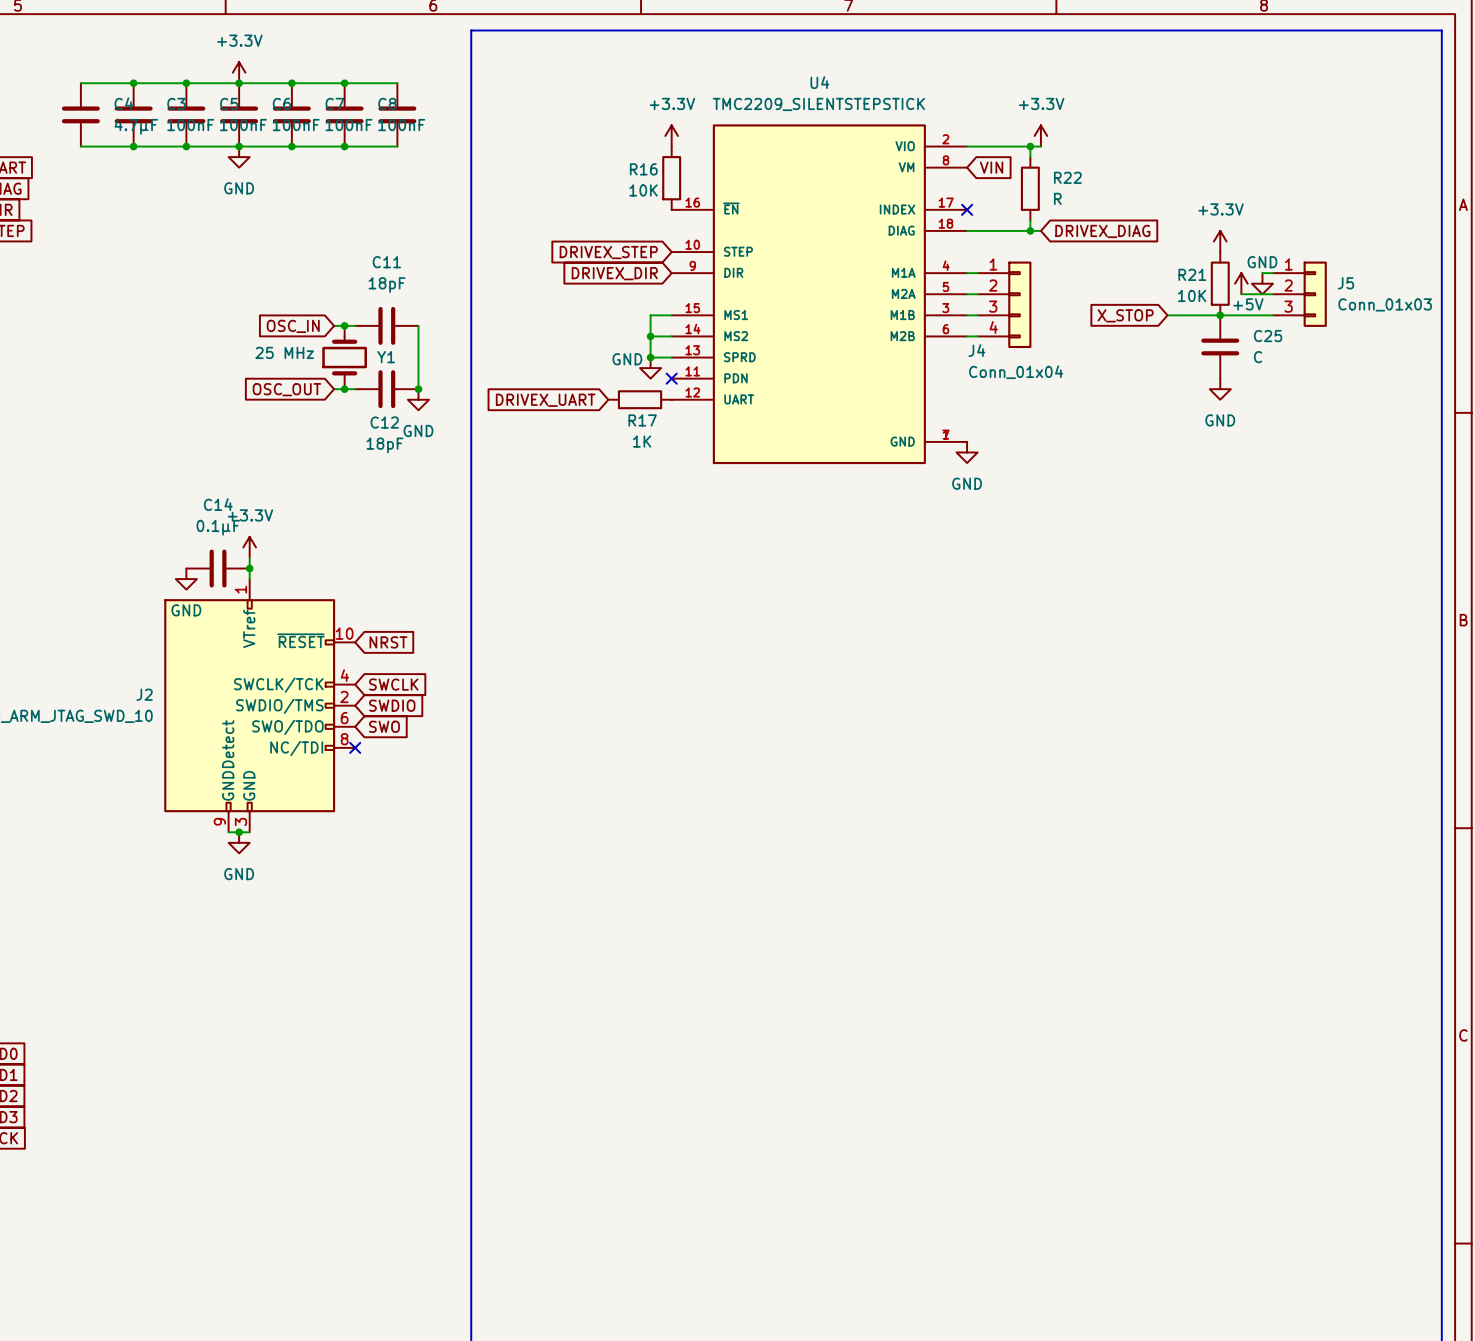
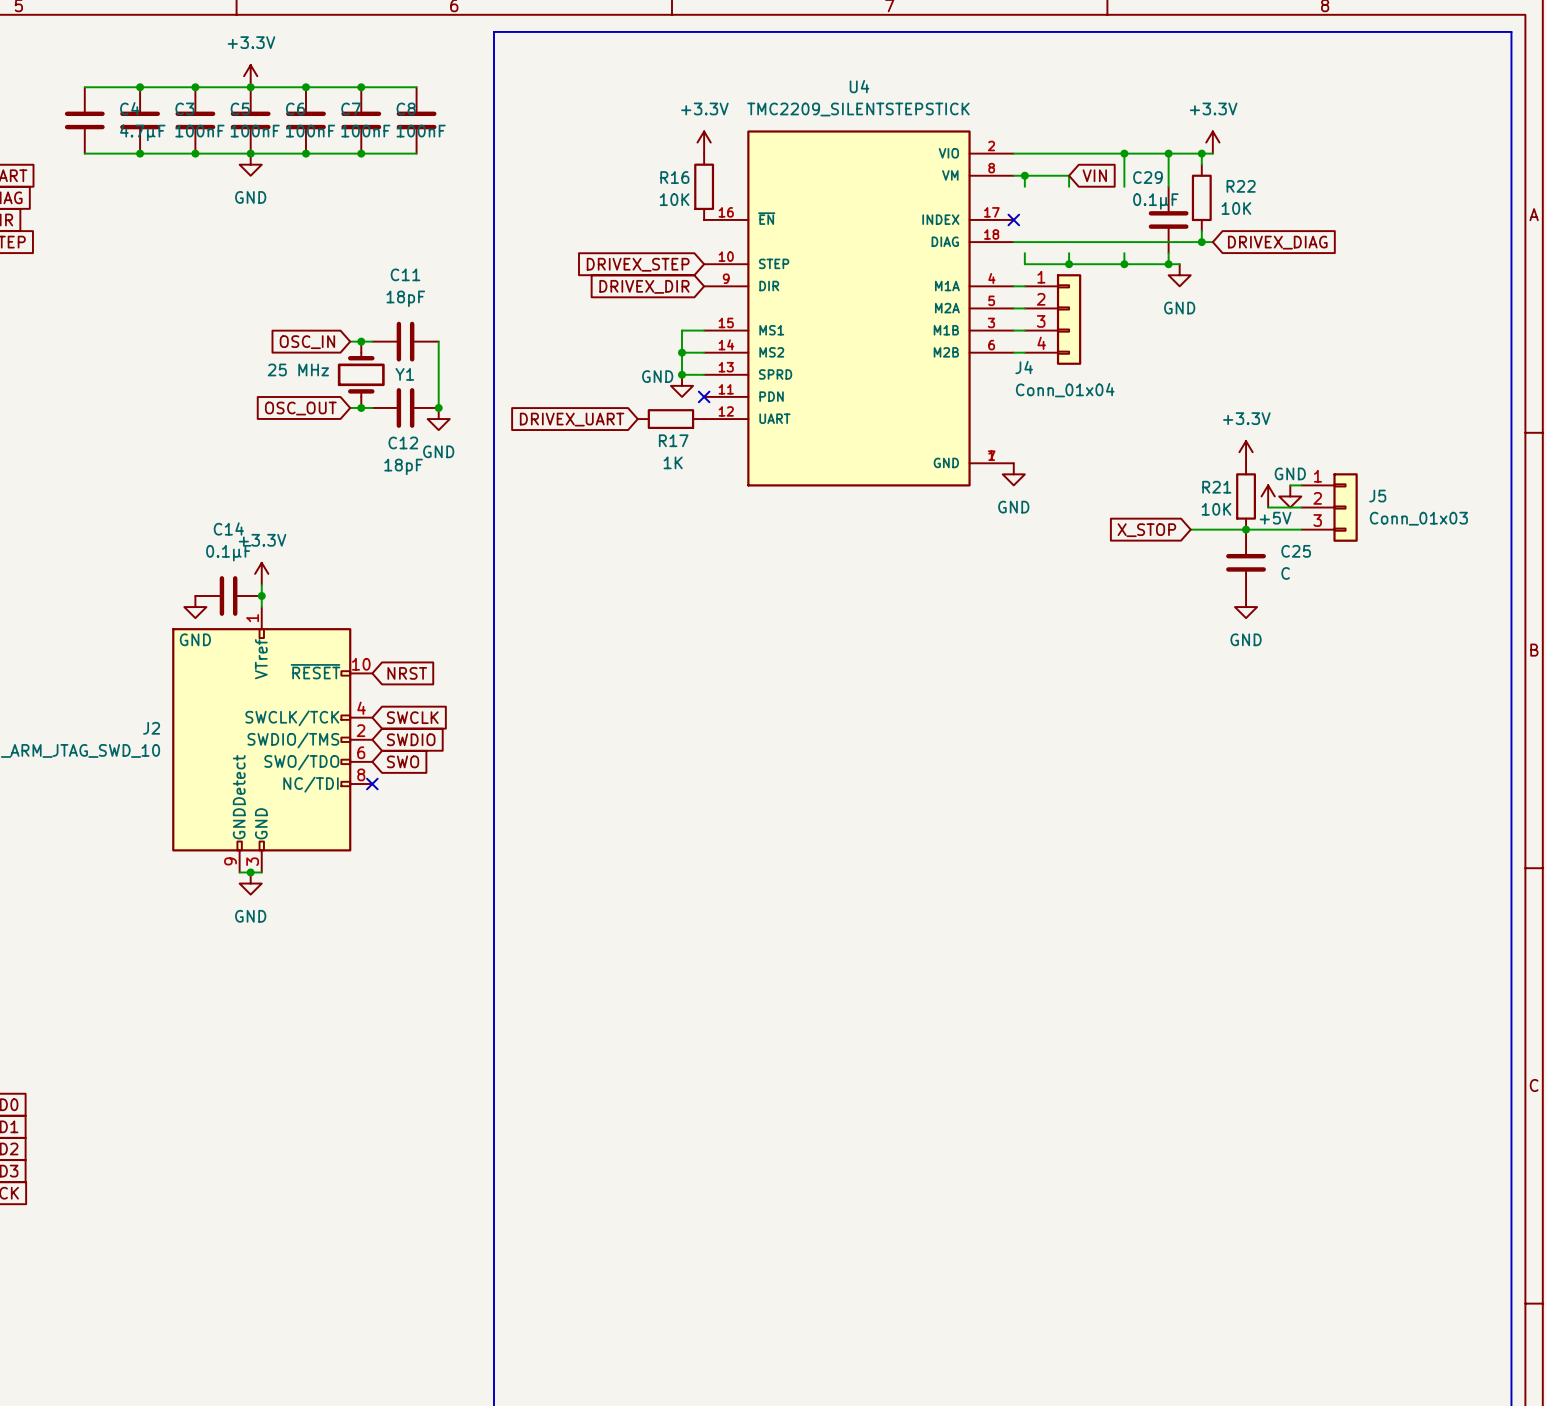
power symbol: +3.3V (1040, 135) -> none
power symbol: none -> +3.3V (1212, 142)
wire: (1030, 146) (1030, 157) -> (1201, 153) (1201, 164)
junction: (1030, 146) -> none
wire: none -> (1091, 153) (1212, 153)
wire: none -> (1124, 153) (1124, 186)
junction: none -> (1124, 153)
wire: none -> (1168, 153) (1168, 186)
junction: none -> (1168, 153)
junction: none -> (1201, 153)
wire: none -> (1013, 175) (1069, 175) (1069, 186)
wire: none -> (1024, 175) (1024, 186)
junction: none -> (1024, 175)
global label position: VIN (991, 167) -> VIN (1094, 175)
R22 position: (1030, 188) -> (1201, 197)
R22 value: R (1057, 198) -> 10K (1236, 208)
C29: none -> 0.1µF (1168, 219)
wire: (1030, 220) (1030, 230) -> (1201, 231) (1201, 242)
junction: (1030, 230) -> none
wire: none -> (1091, 242) (1212, 242)
junction: none -> (1201, 242)
global label position: DRIVEX_DIAG (1102, 231) -> DRIVEX_DIAG (1277, 242)
wire: none -> (1024, 253) (1024, 264) (1179, 264)
wire: none -> (1069, 253) (1069, 264)
wire: none -> (1124, 253) (1124, 264)
wire: none -> (1168, 253) (1168, 264)
power symbol: +3.3V (1220, 241) -> none
junction: none -> (1069, 264)
junction: none -> (1124, 264)
junction: none -> (1168, 264)
power symbol: none -> GND (1179, 275)
wire: (1262, 273) (1273, 273) -> (1290, 485) (1301, 485)
R21 position: (1220, 283) -> (1246, 496)
power symbol position: +5V (1241, 283) -> +5V (1268, 496)
power symbol: GND (1262, 283) -> none
wire: (1241, 294) (1273, 294) -> (1268, 507) (1301, 507)
J5 position: (1299, 294) -> (1329, 507)
global label position: X_STOP (1125, 315) -> X_STOP (1146, 530)
wire: (1167, 315) (1273, 315) -> (1190, 529) (1301, 529)
junction: (1220, 315) -> none
C25 position: (1220, 346) -> (1246, 562)
power symbol: GND (1220, 389) -> none
power symbol: none -> +3.3V (1246, 452)
power symbol: none -> GND (1290, 496)
junction: none -> (1246, 529)
power symbol: none -> GND (1246, 607)

